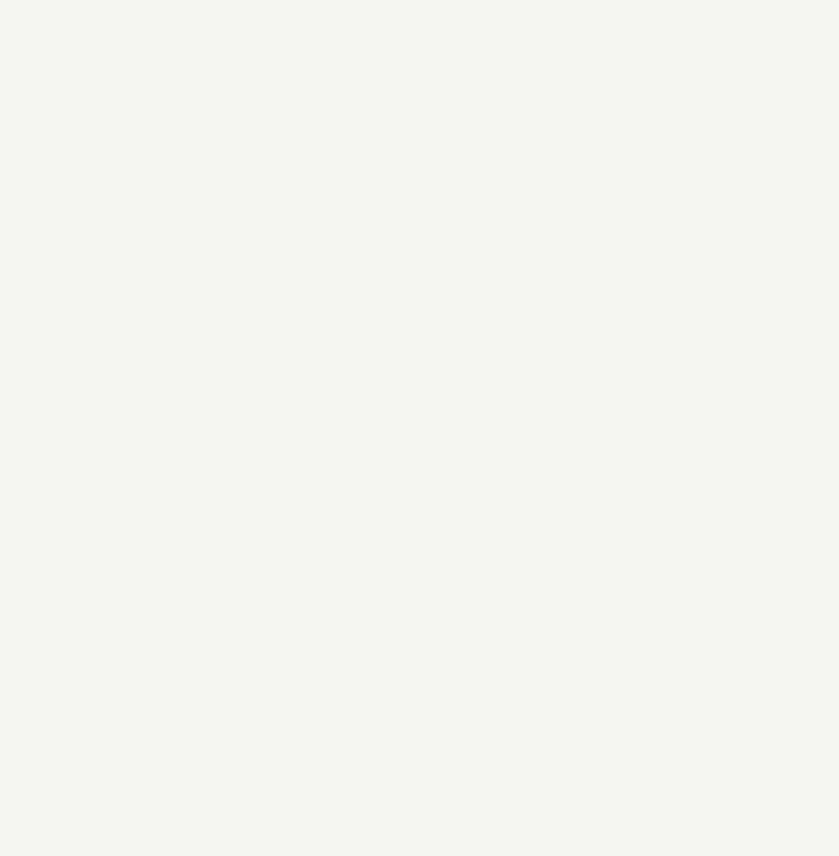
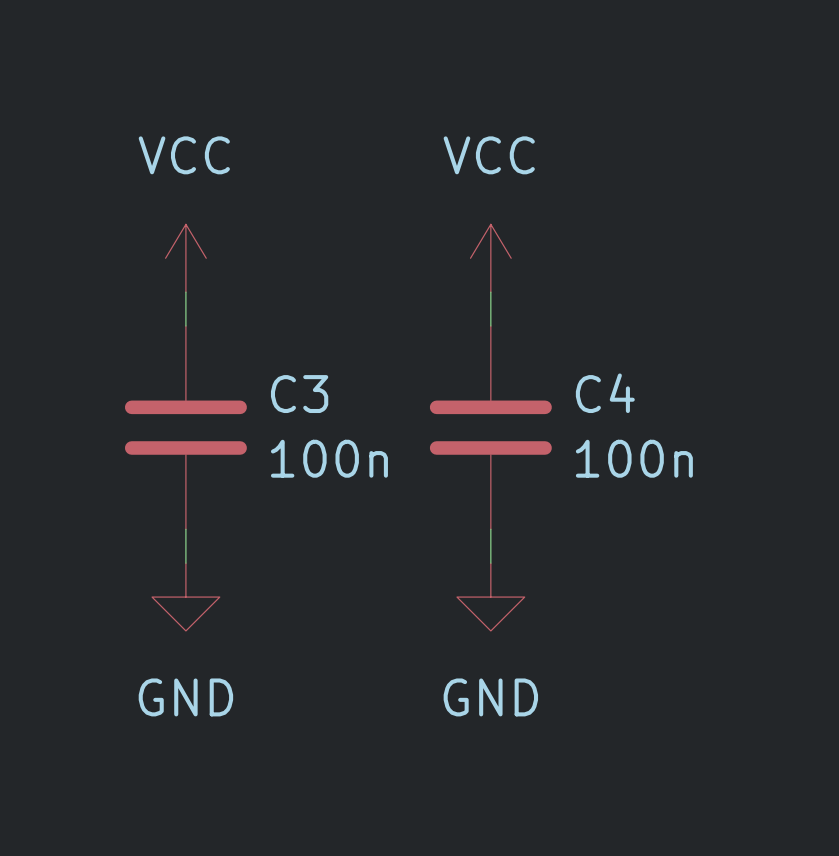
power symbol: none -> VCC (185, 258)
power symbol: none -> VCC (490, 258)
wire: none -> (185, 292) (185, 326)
wire: none -> (490, 292) (490, 326)
C3: none -> 100n (185, 427)
C4: none -> 100n (490, 427)
wire: none -> (185, 529) (185, 563)
wire: none -> (490, 529) (490, 563)
power symbol: none -> GND (185, 597)
power symbol: none -> GND (490, 597)

